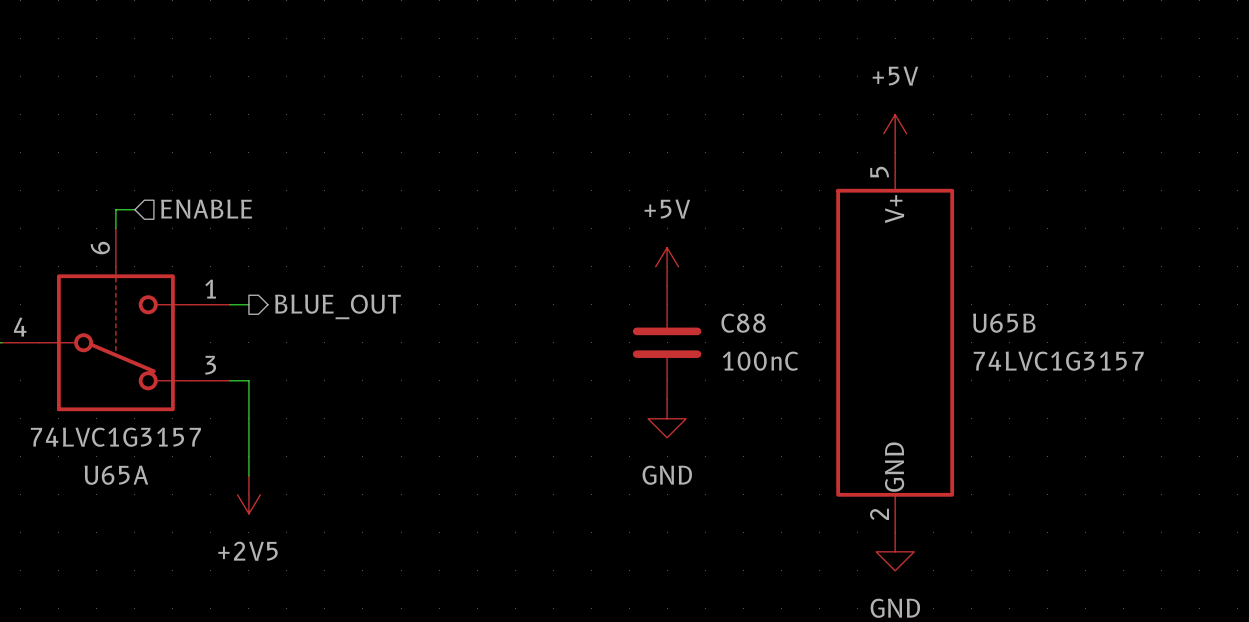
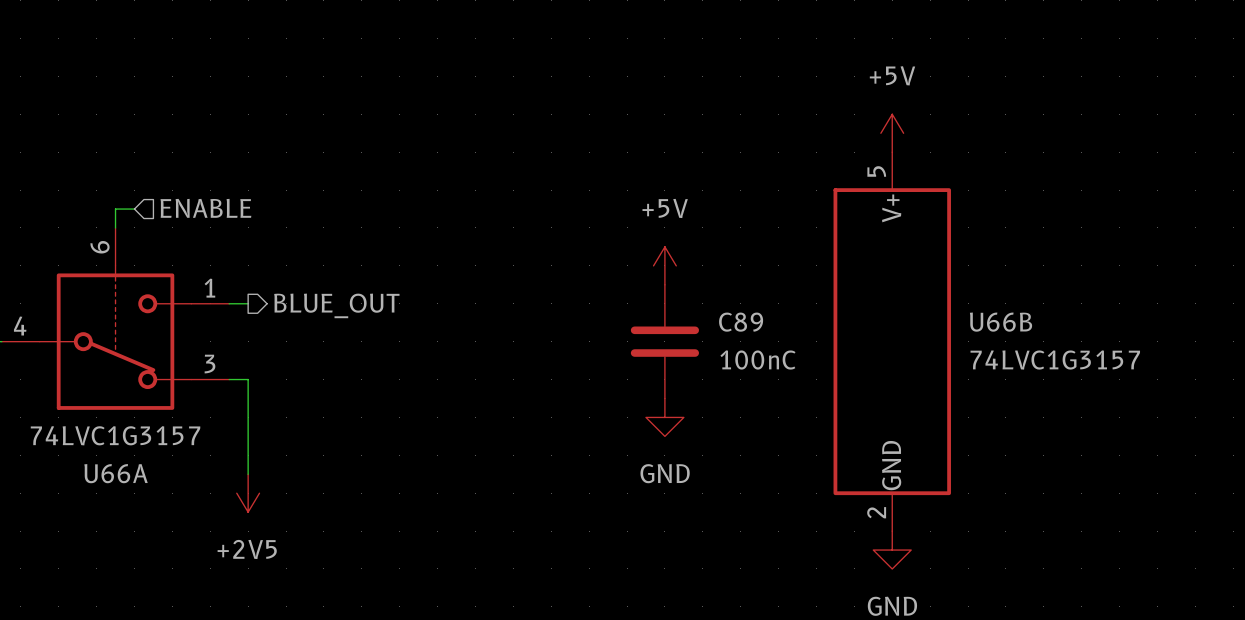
C88 name: C88 (743, 323) -> C89 (741, 322)
U65B name: U65B (1004, 323) -> U66B (1001, 322)
U65A name: U65A (116, 475) -> U66A (116, 473)

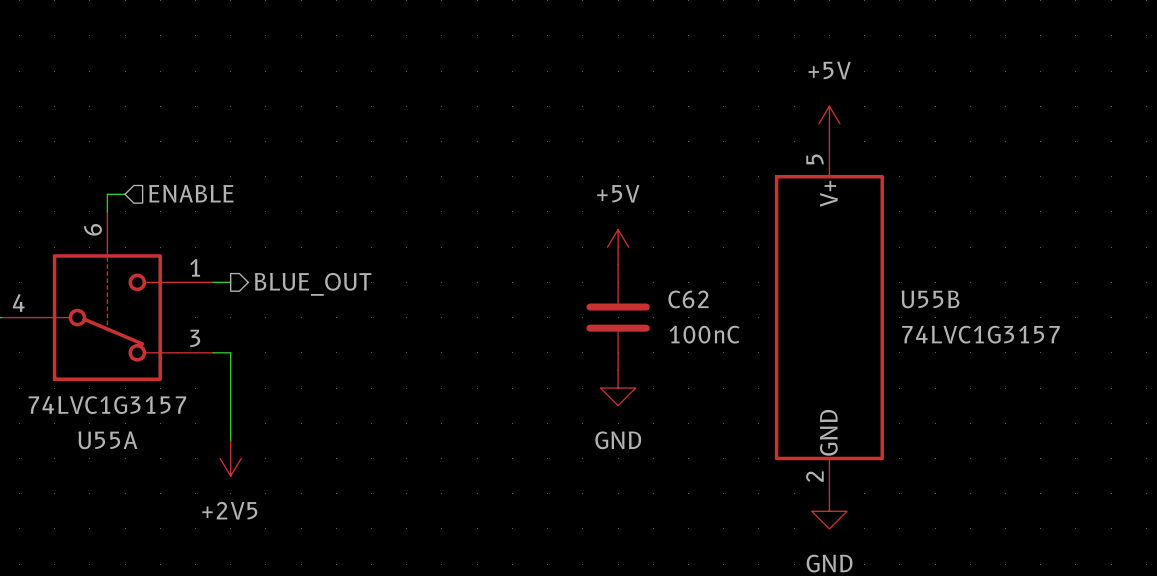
C89 name: C89 (741, 322) -> C62 (688, 299)
U66B name: U66B (1001, 322) -> U55B (930, 299)
U66A name: U66A (116, 473) -> U55A (107, 440)

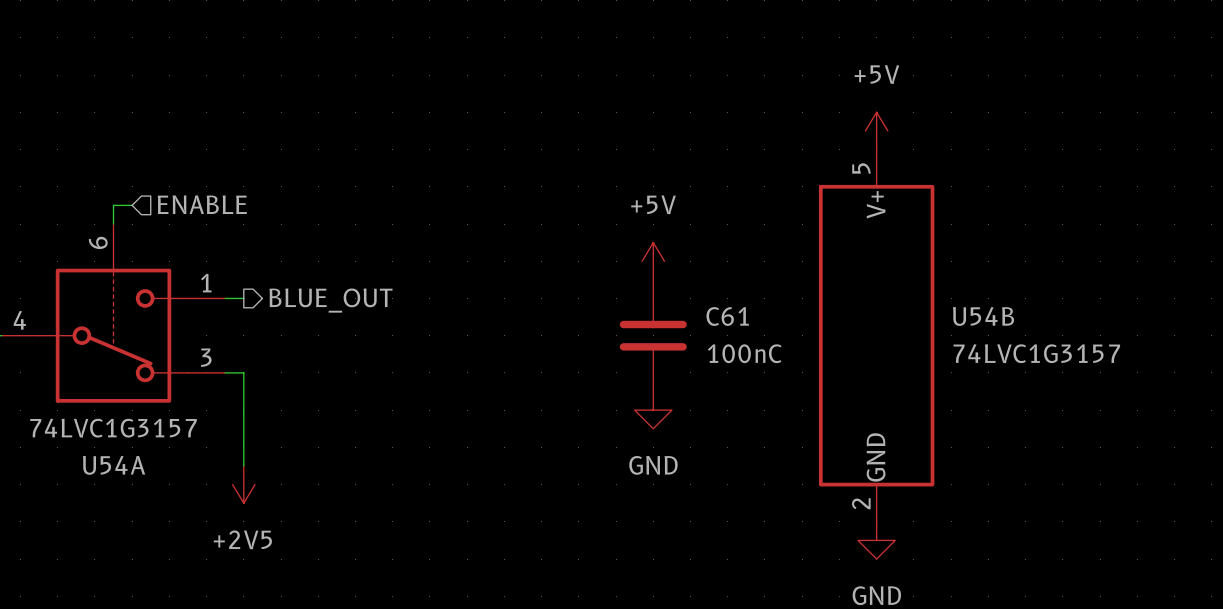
C62 name: C62 (688, 299) -> C61 (727, 316)
U55B name: U55B (930, 299) -> U54B (983, 316)
U55A name: U55A (107, 440) -> U54A (114, 465)

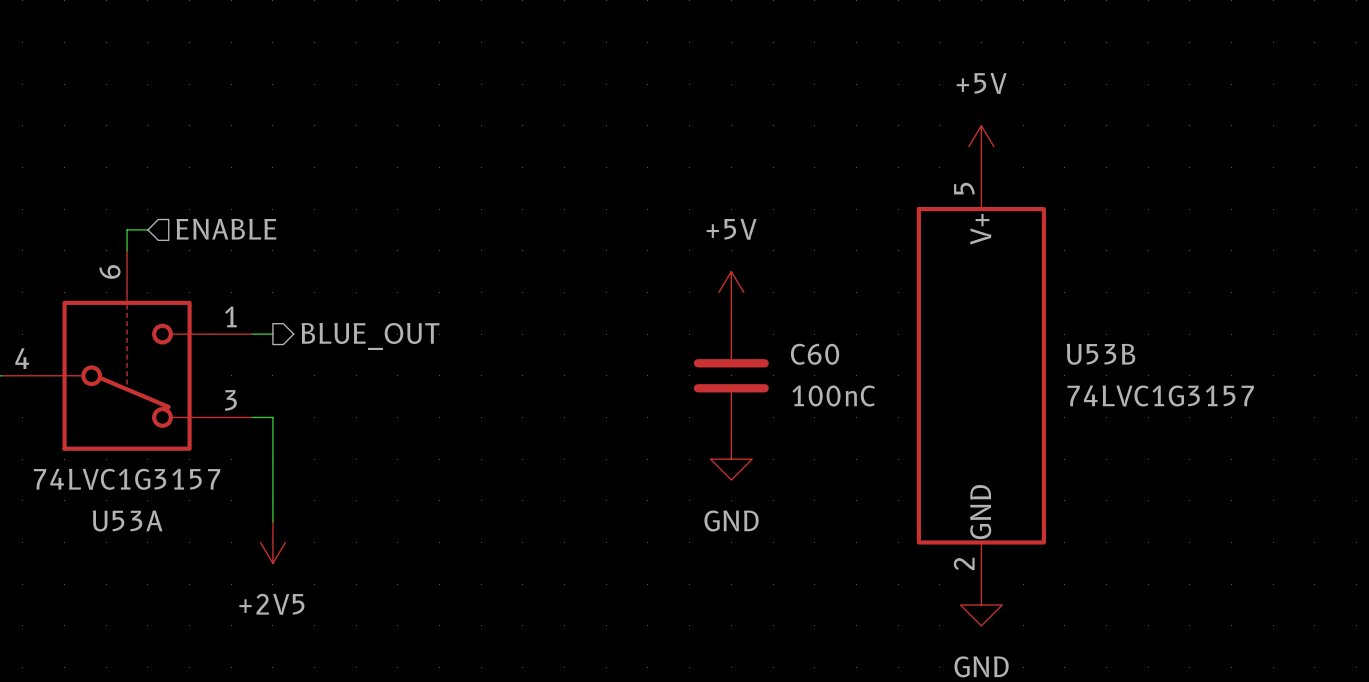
C61 name: C61 (727, 316) -> C60 (815, 354)
U54B name: U54B (983, 316) -> U53B (1101, 354)
U54A name: U54A (114, 465) -> U53A (127, 520)

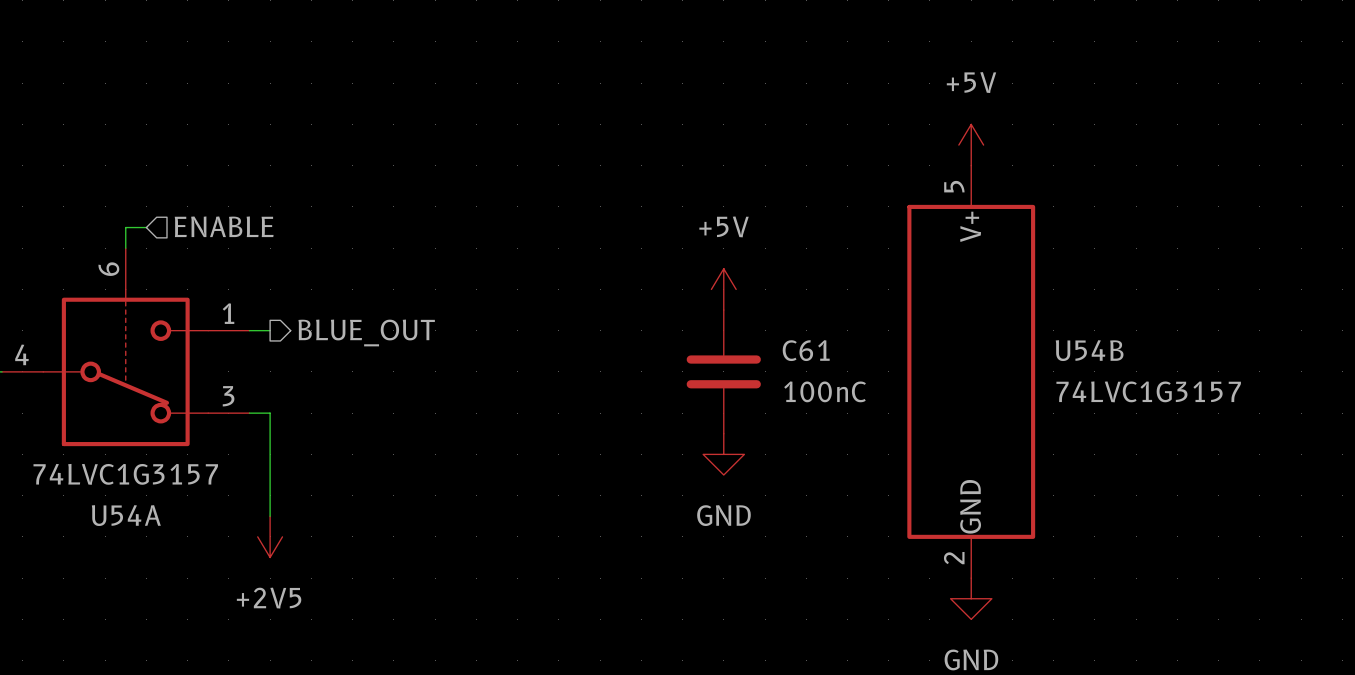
C60 name: C60 (815, 354) -> C61 (806, 350)
U53B name: U53B (1101, 354) -> U54B (1089, 350)
U53A name: U53A (127, 520) -> U54A (126, 515)

